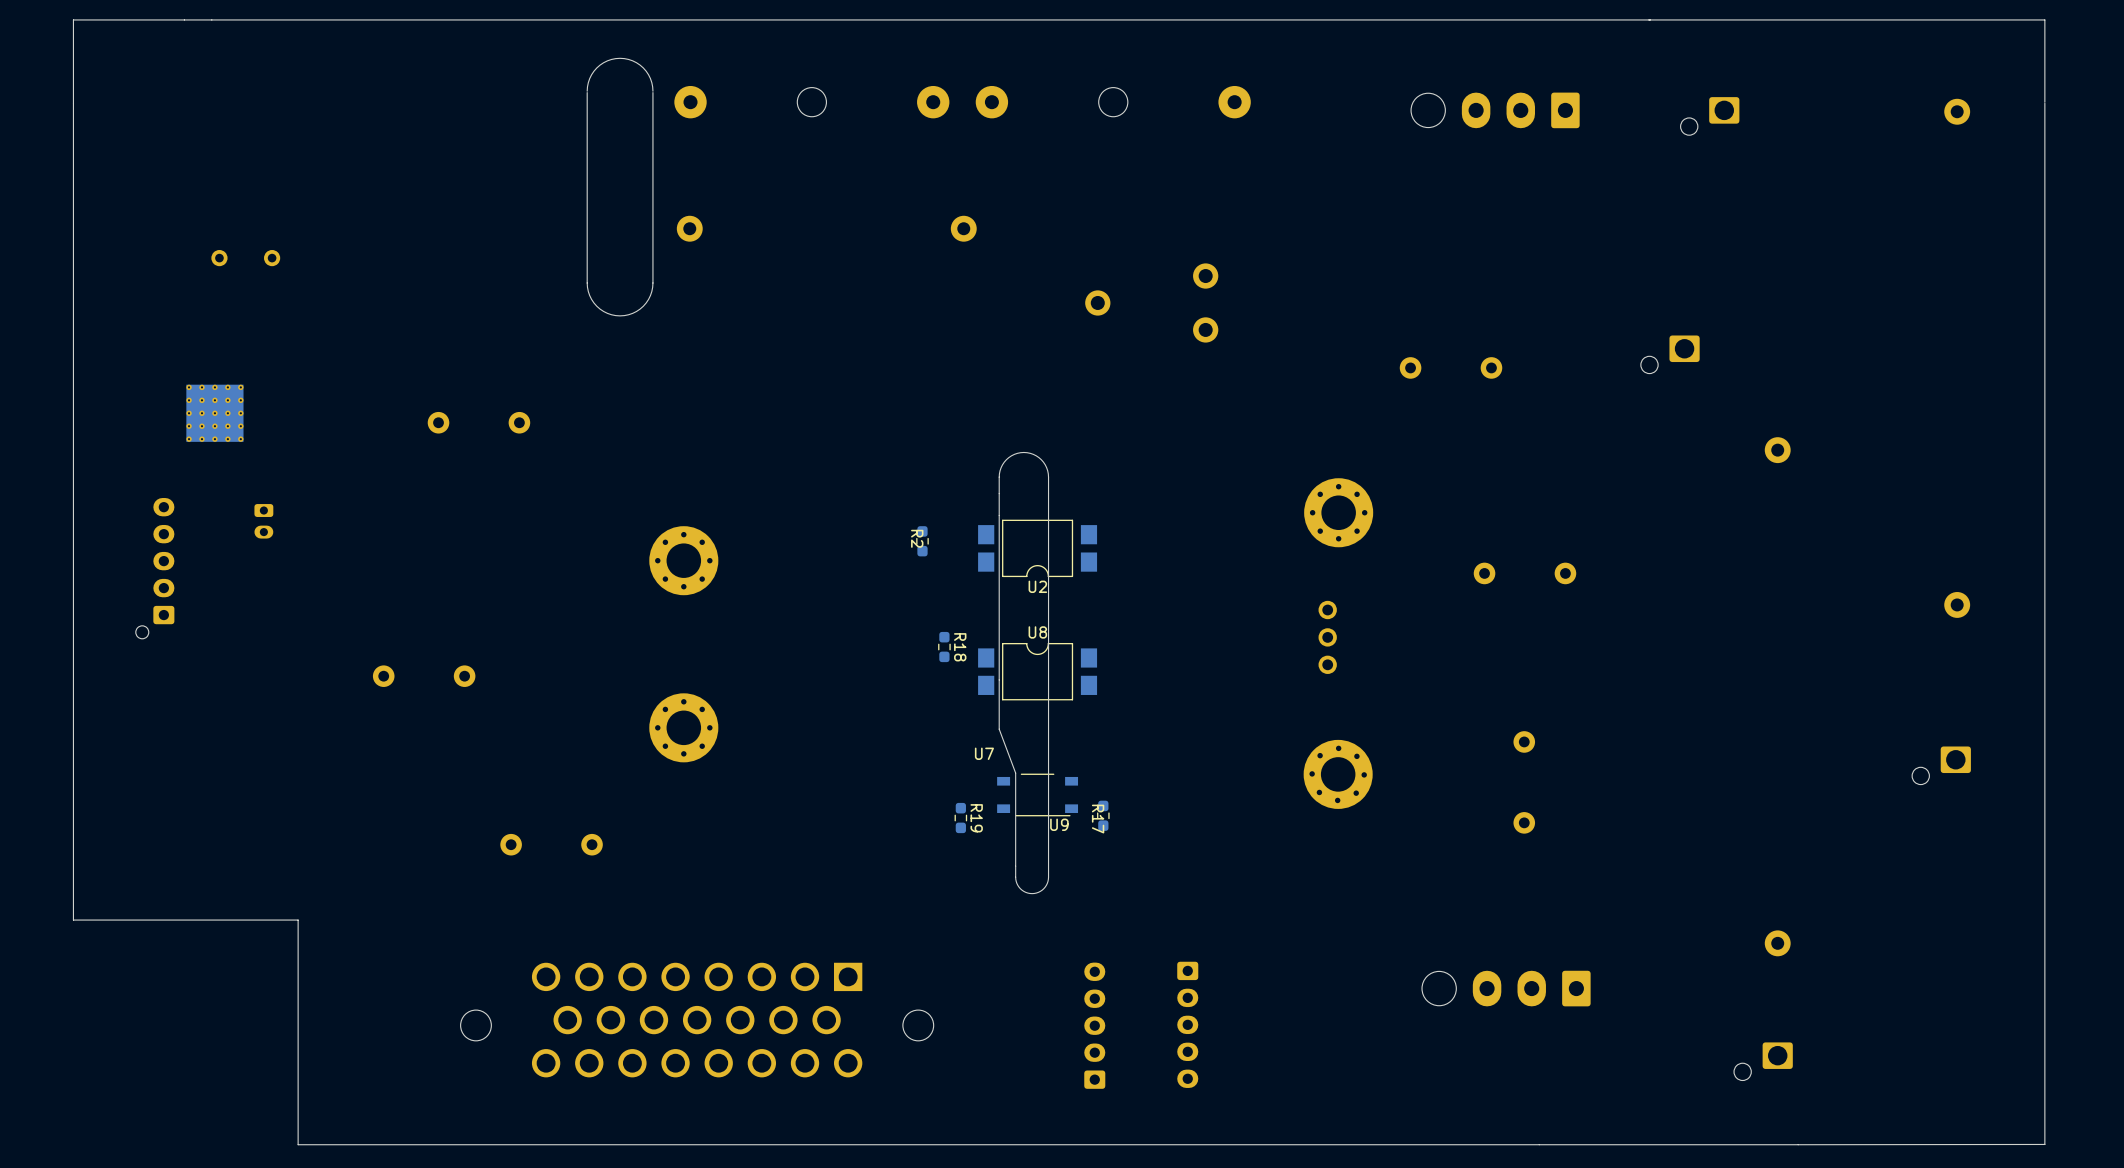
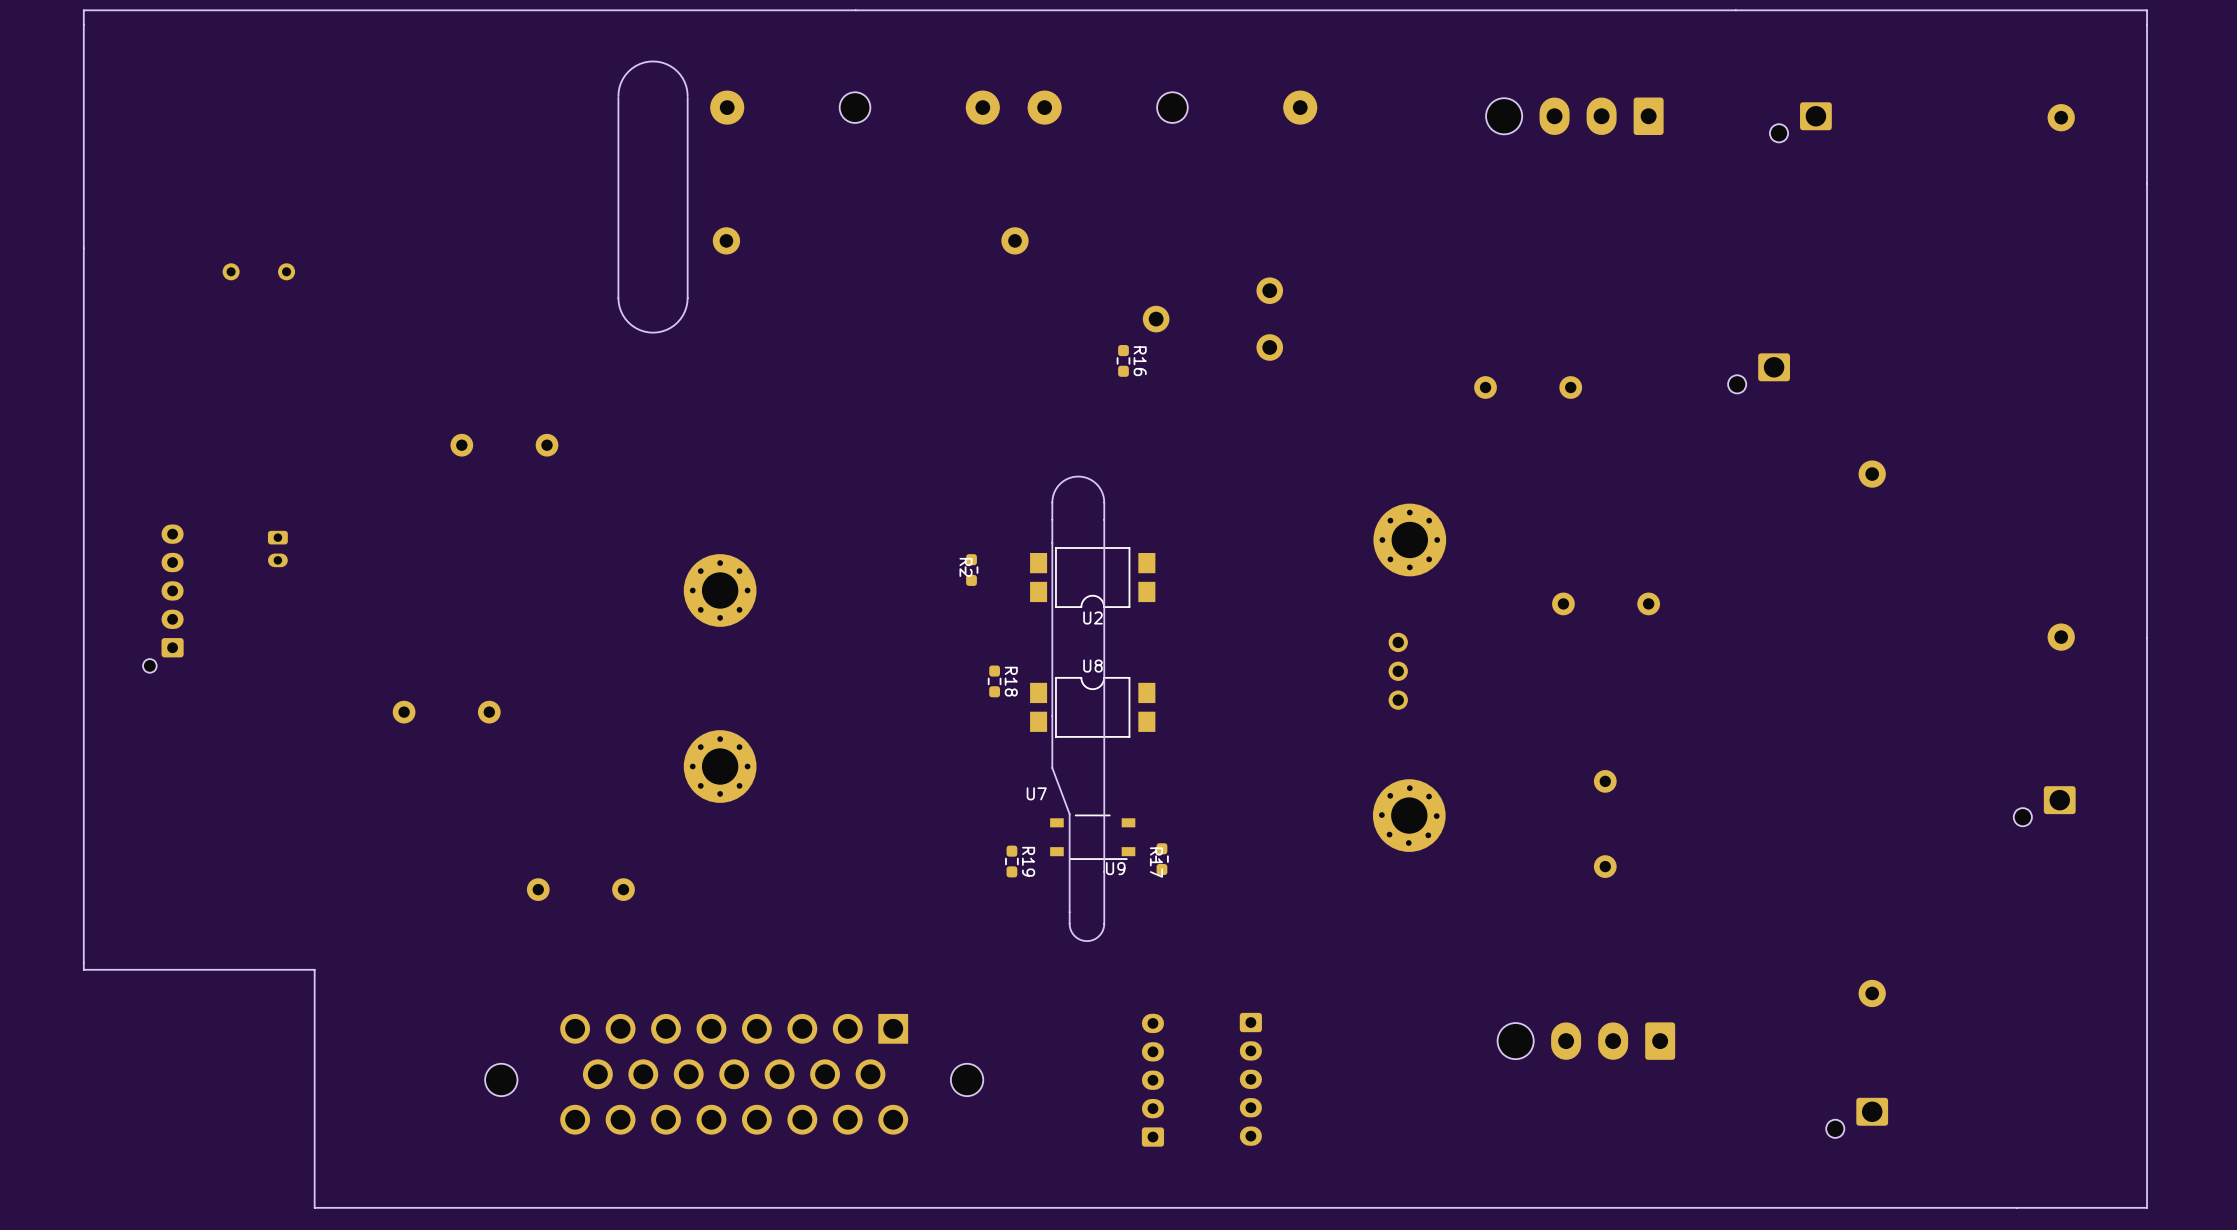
board edge: none -> (2147, 10) (2147, 1207) (314, 1207) (314, 969) (83, 969) (83, 10) (2147, 10)
board edge: (2044, 102) (2044, 19) (73, 19) (73, 920) (298, 920) (298, 1144) (2044, 1144) (2044, 103) -> none
R16: none -> (1123, 360)
part: (214, 413) -> none

